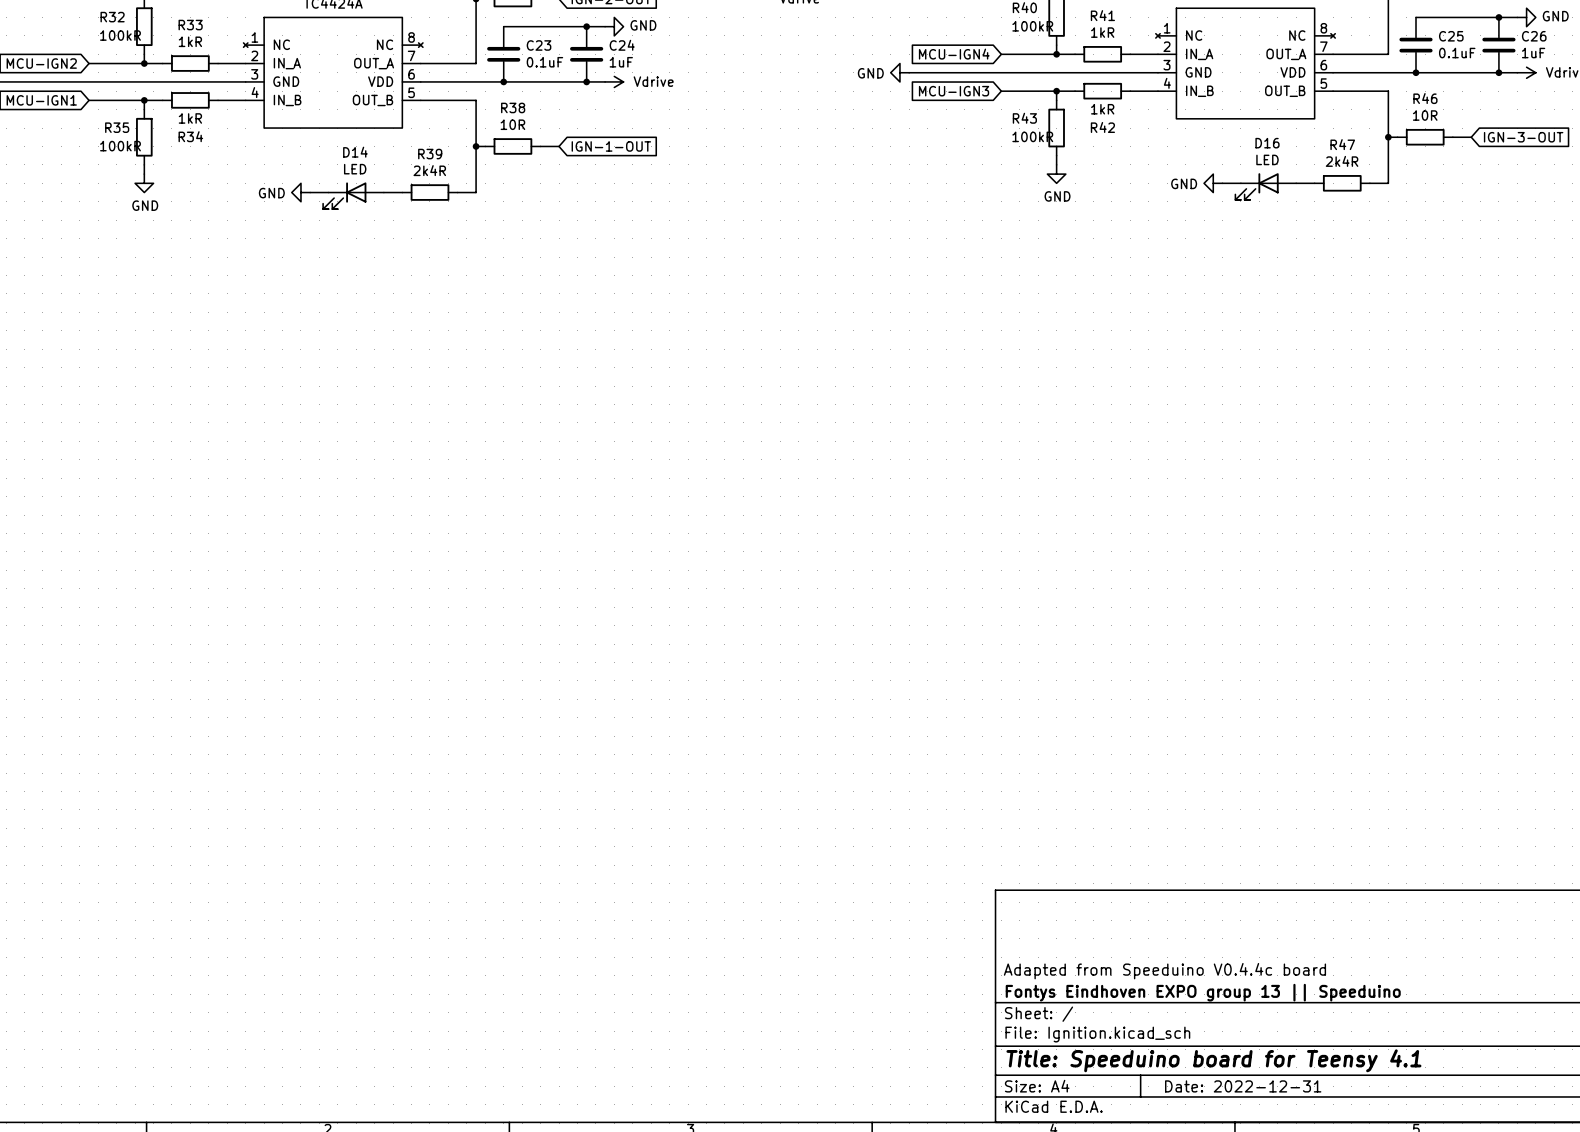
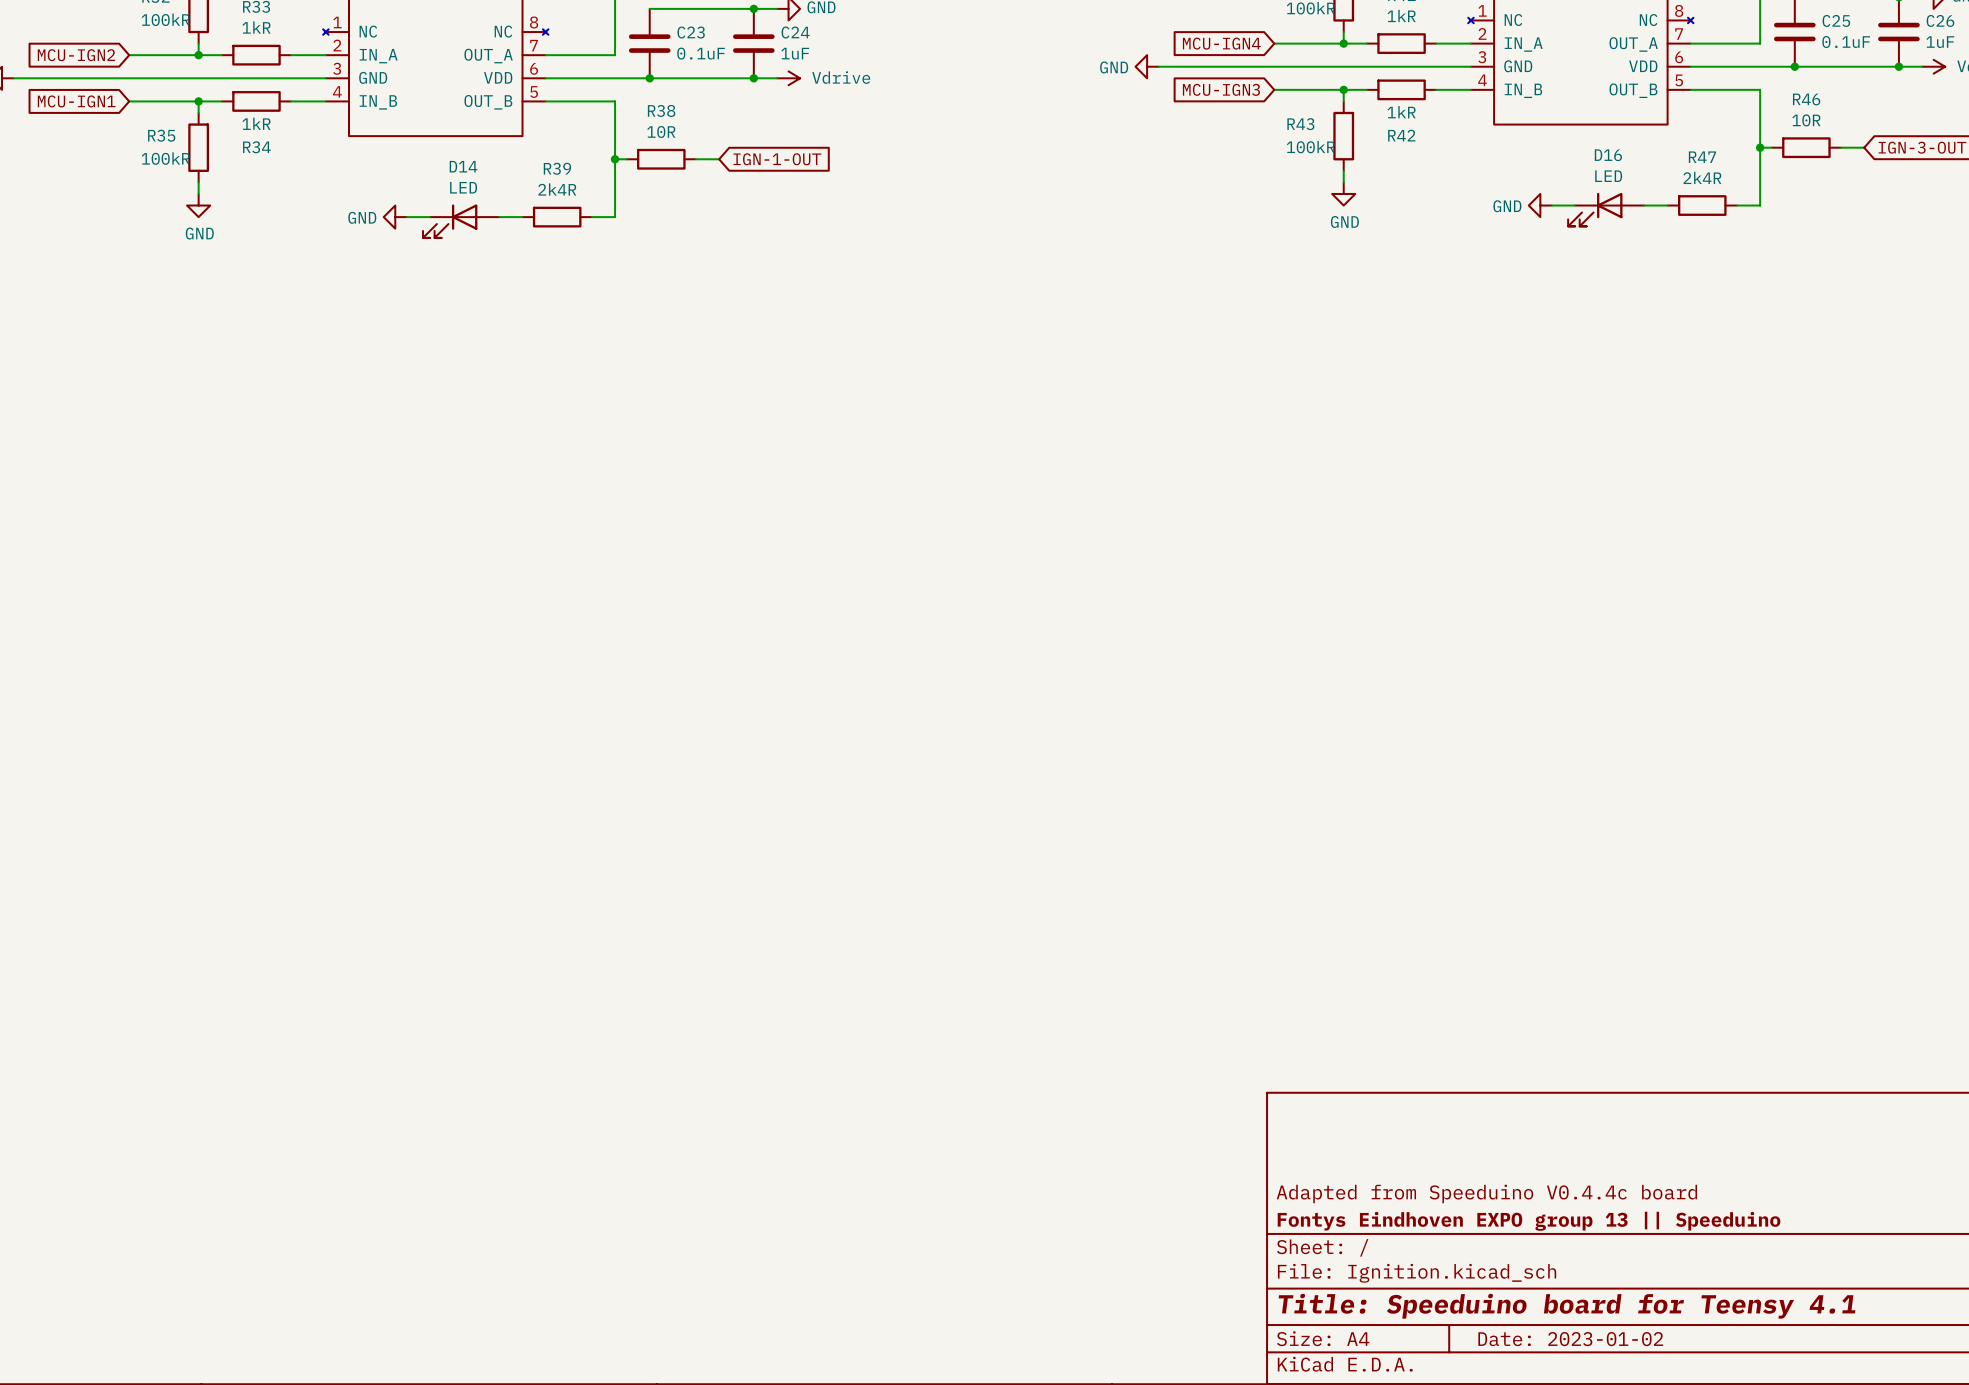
title block: Date: 2022-12-31 (1243, 1086) -> Date: 2023-01-02 (1570, 1339)

